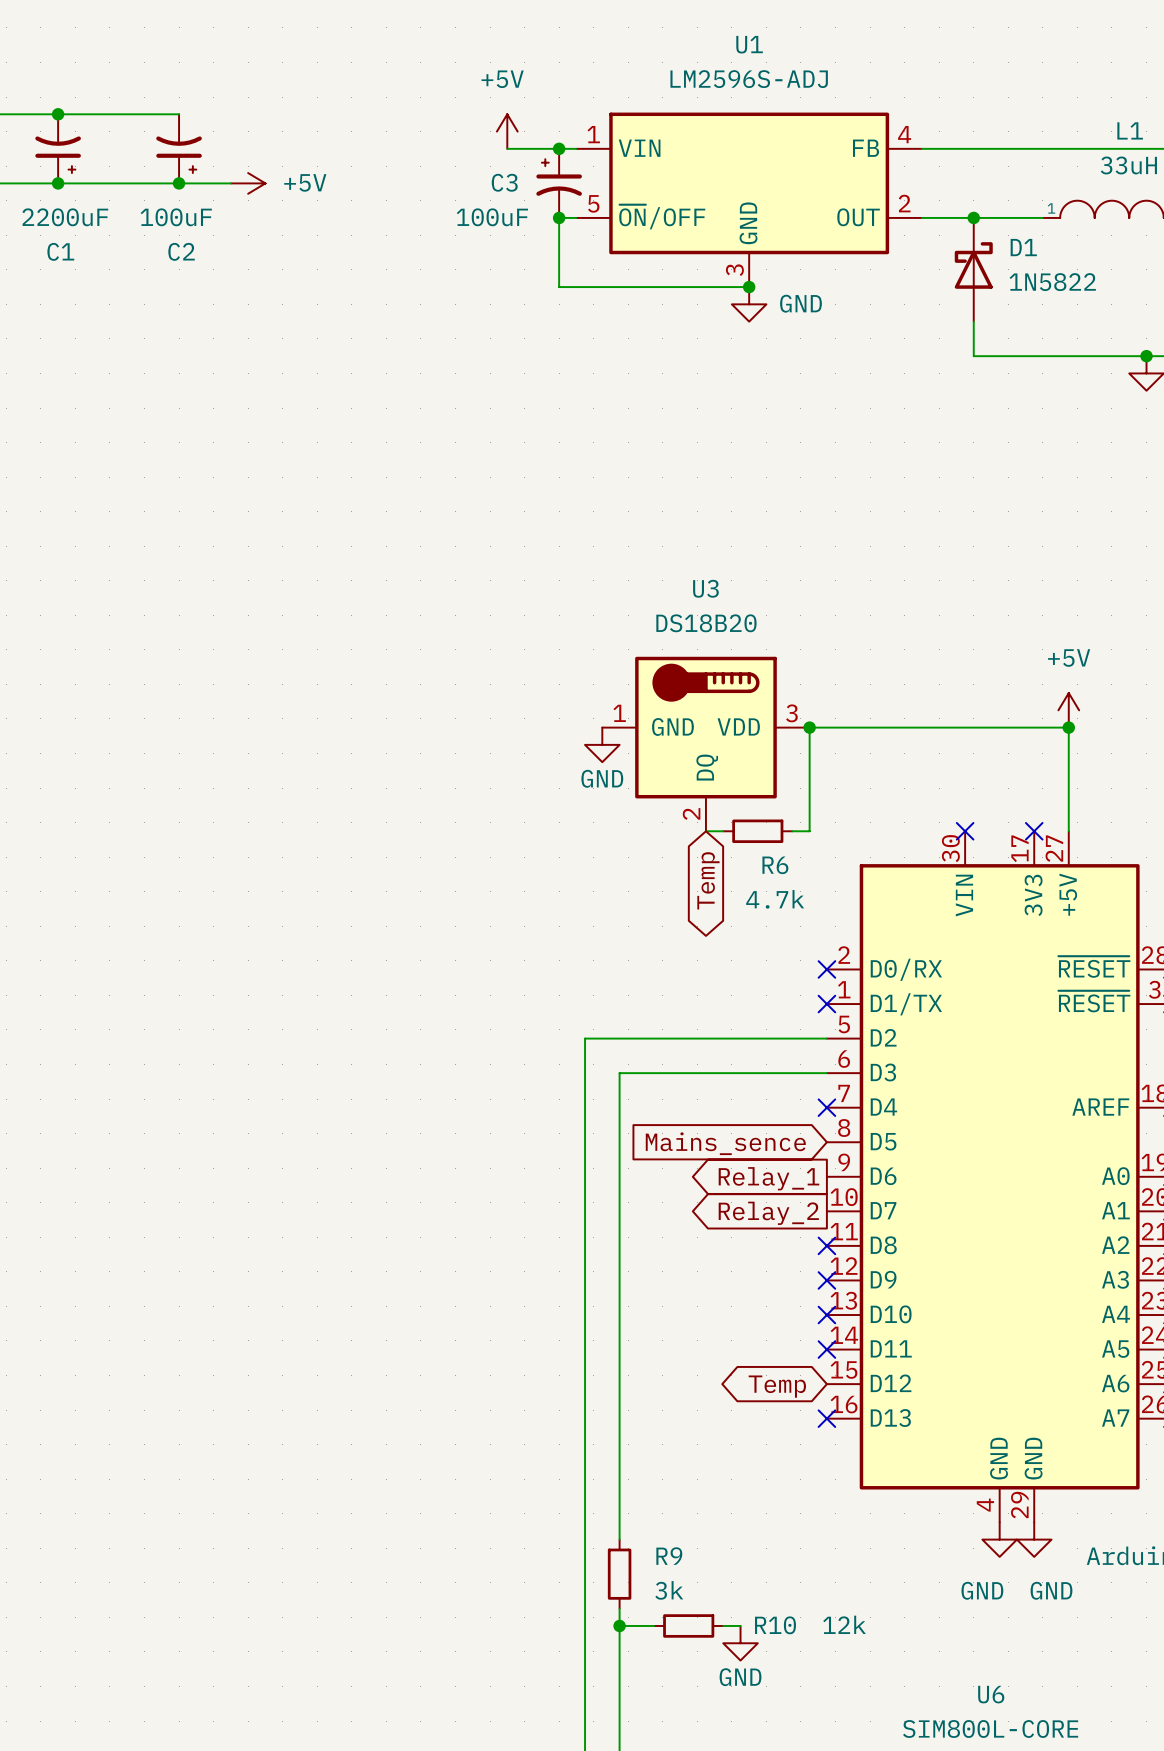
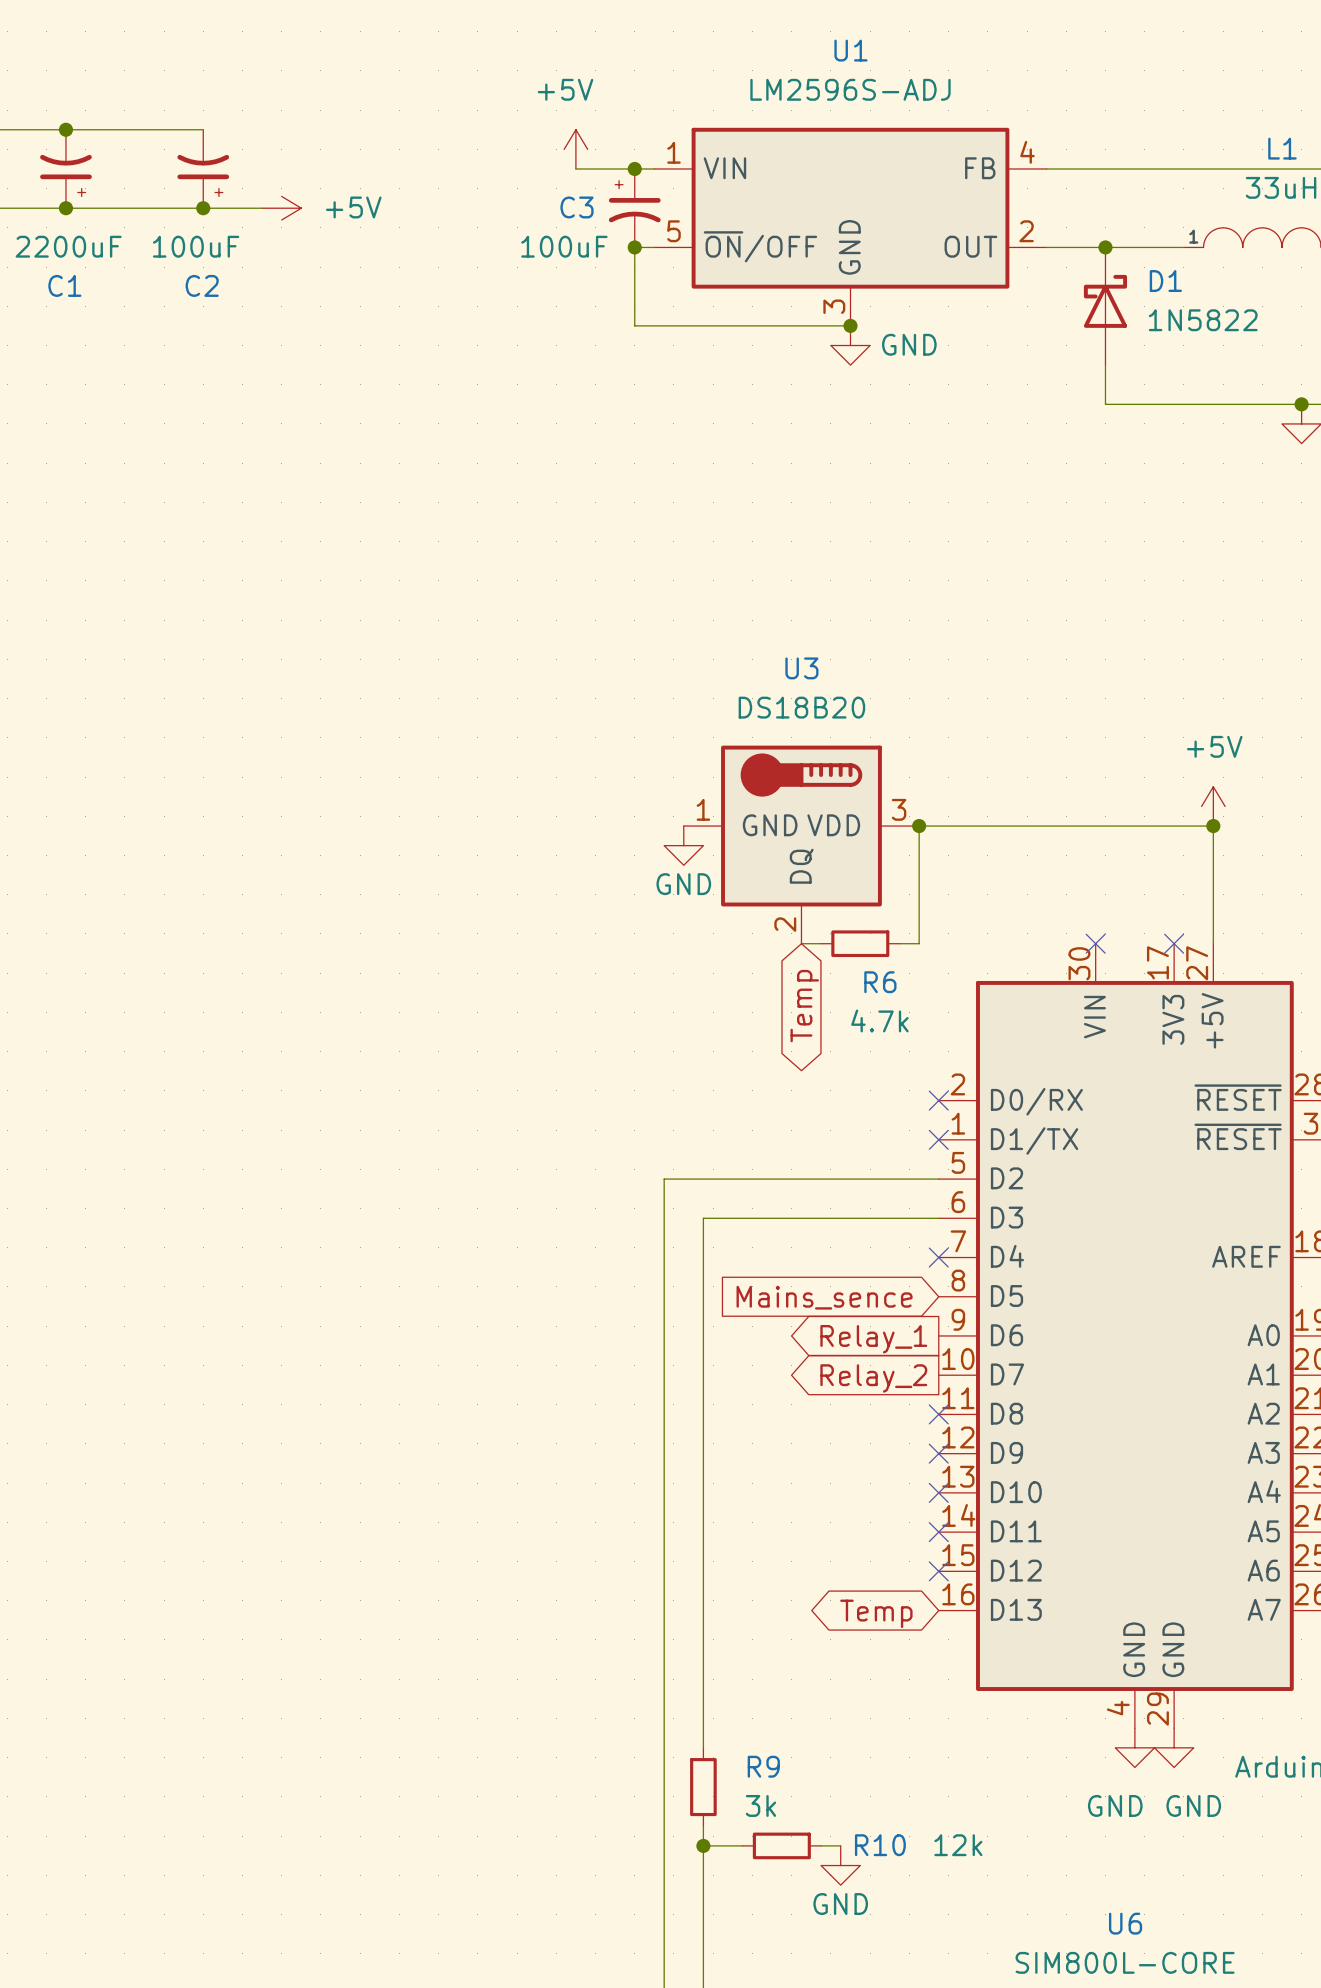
global label position: Temp (777, 1386) -> Temp (876, 1613)
no-connect mark position: (826, 1418) -> (938, 1571)

